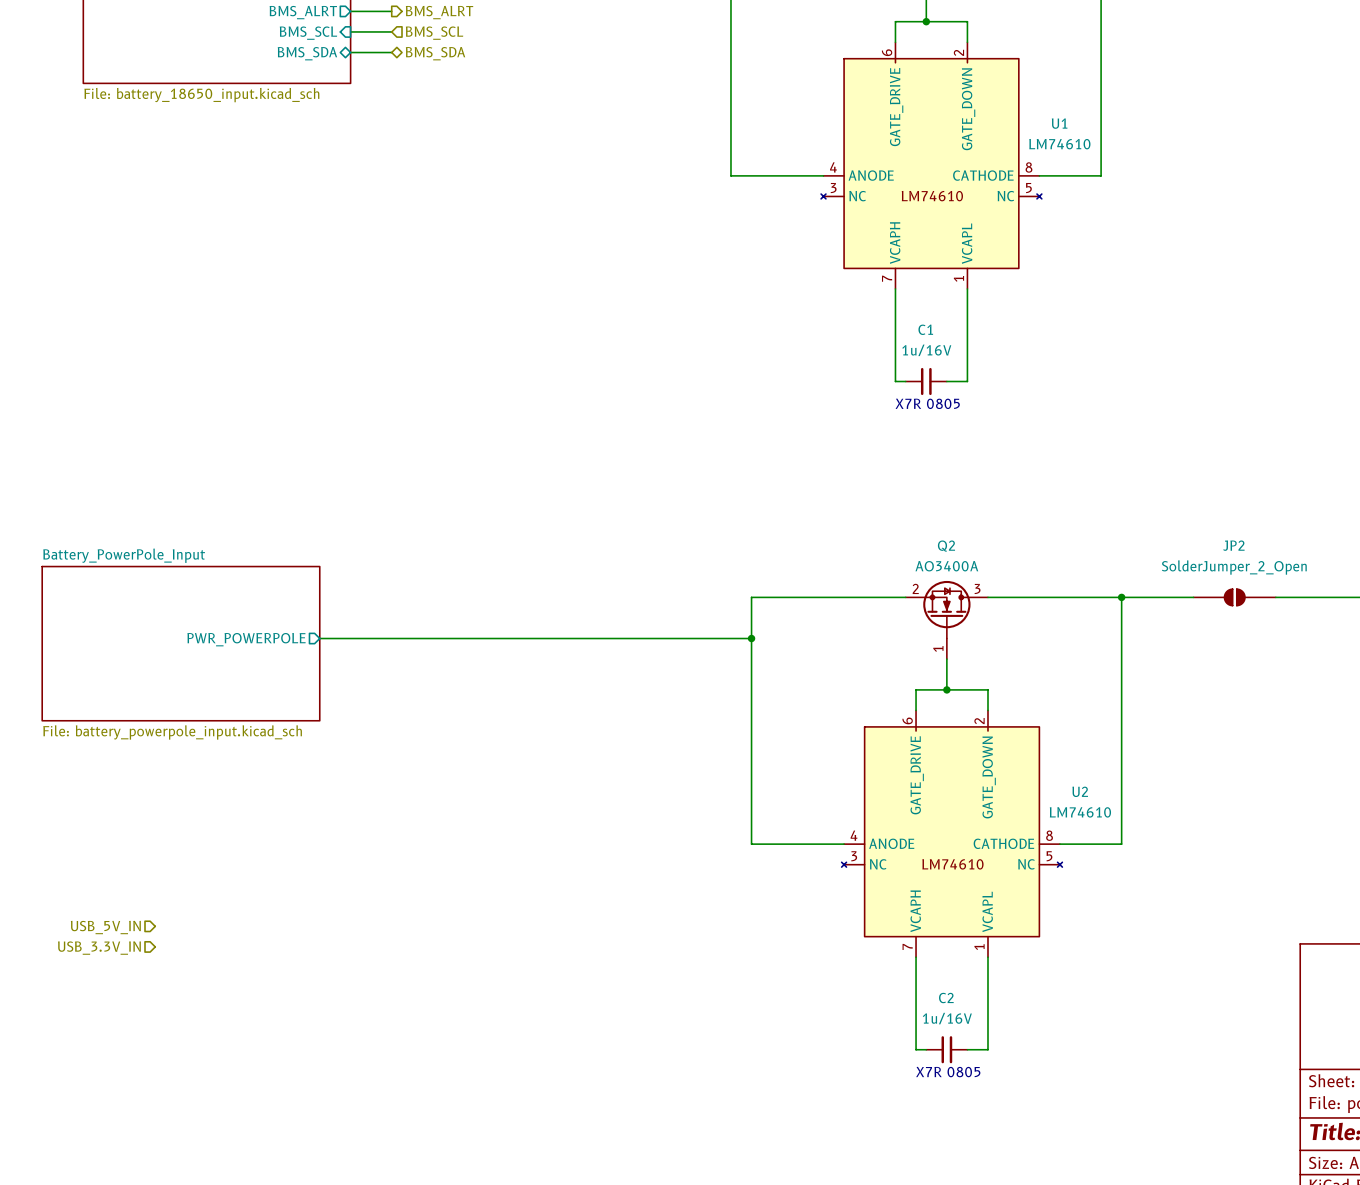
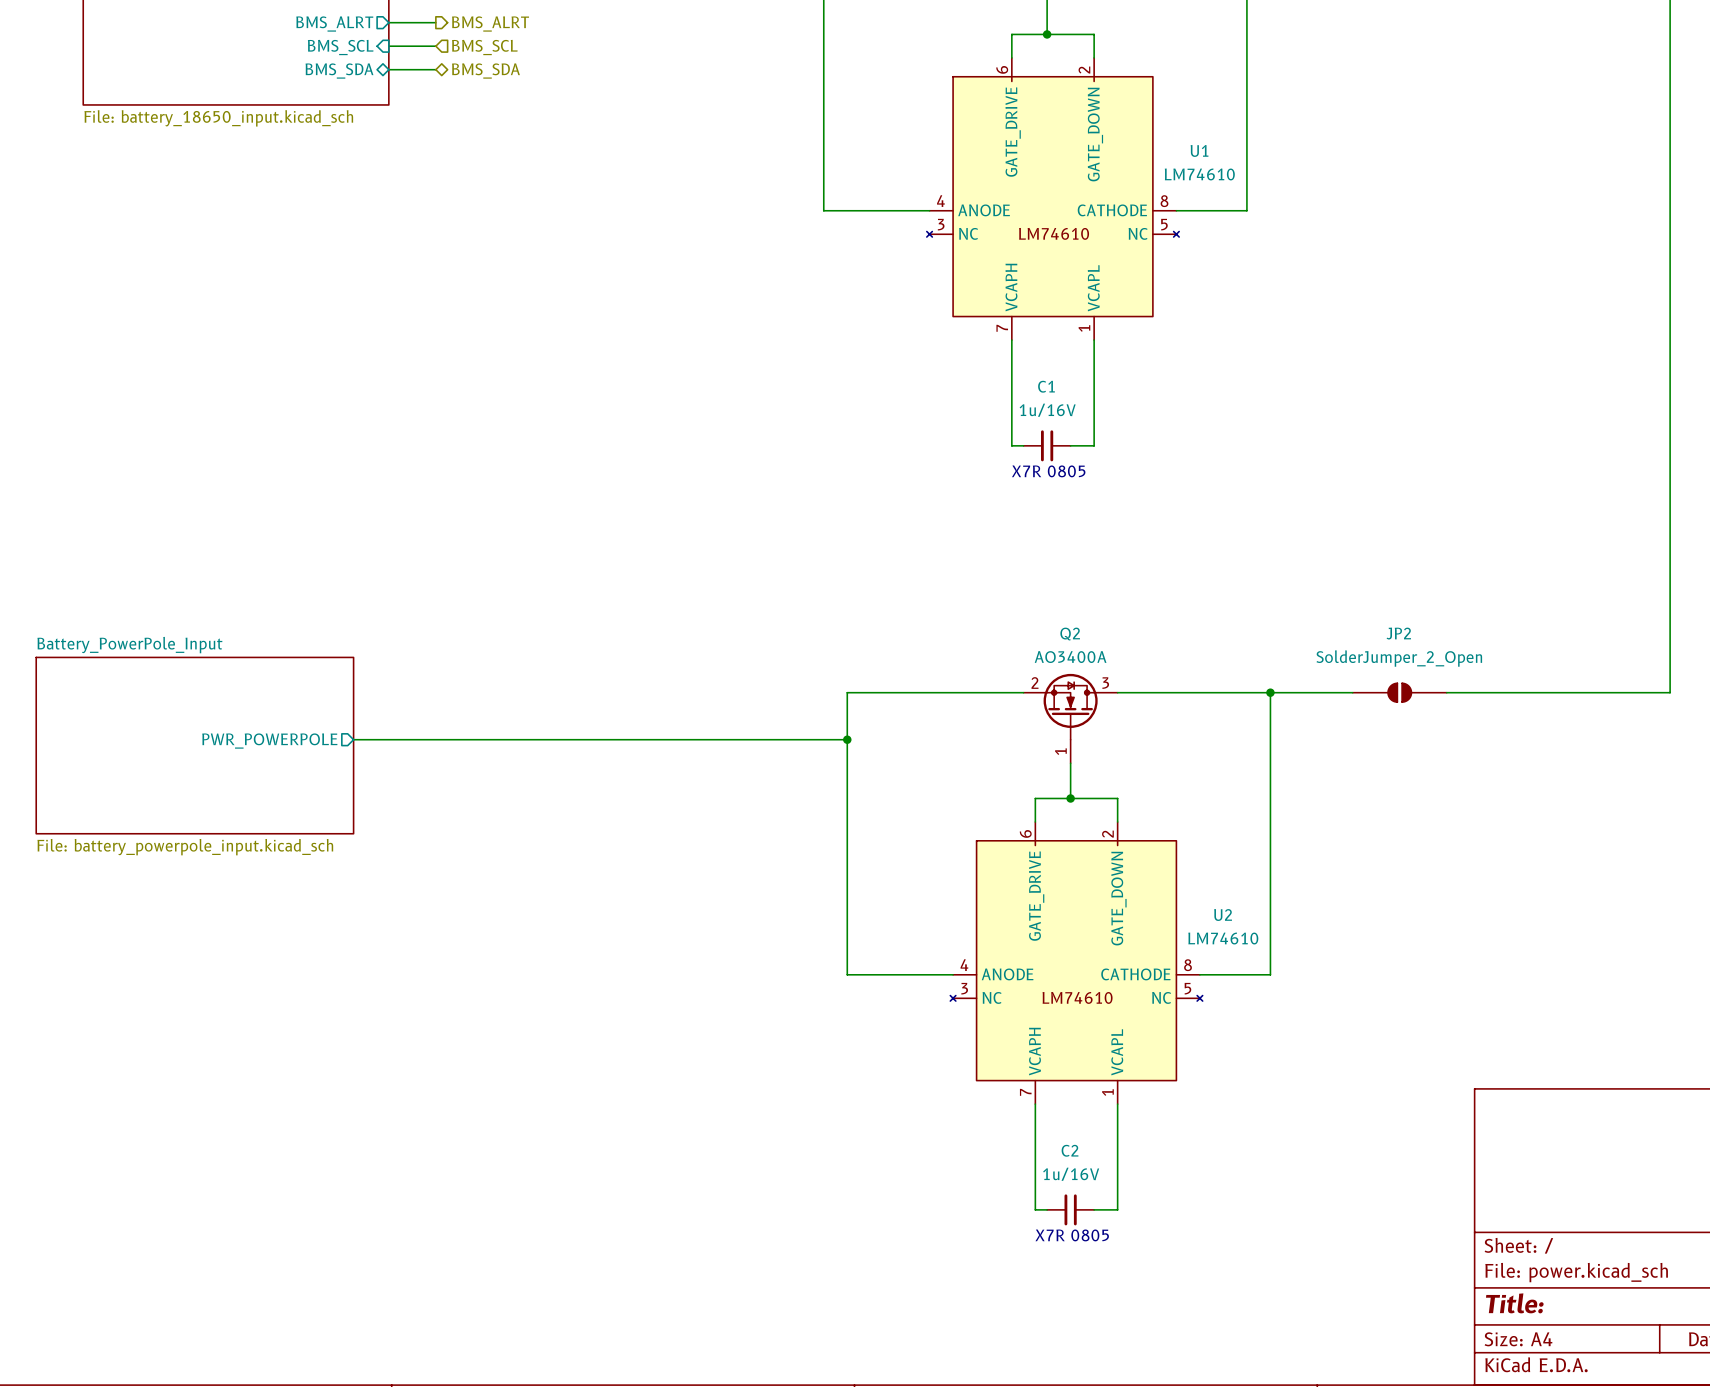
hierarchical label: USB_5V_IN (105, 927) -> none
hierarchical label: USB_3.3V_IN (99, 948) -> none

